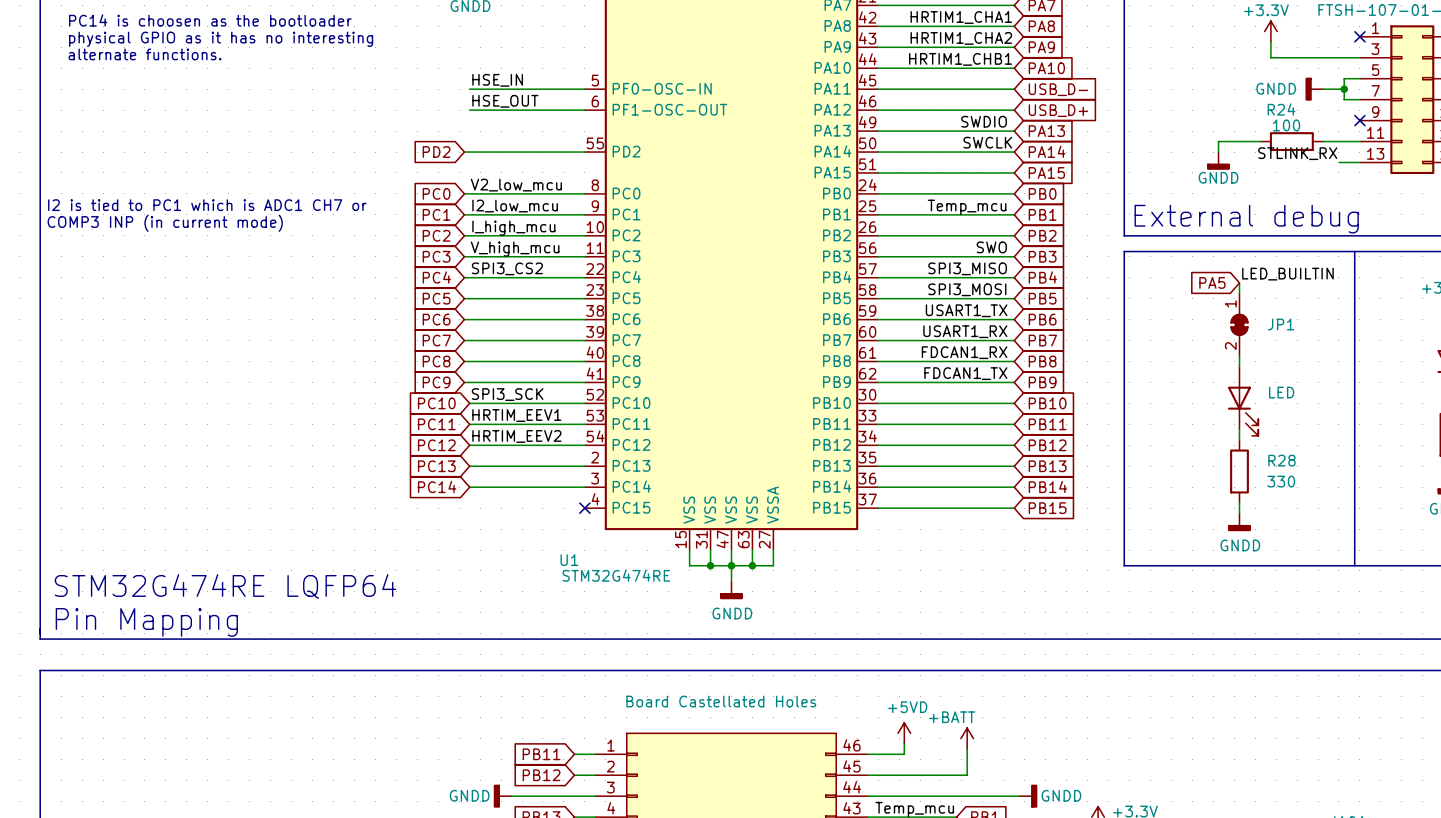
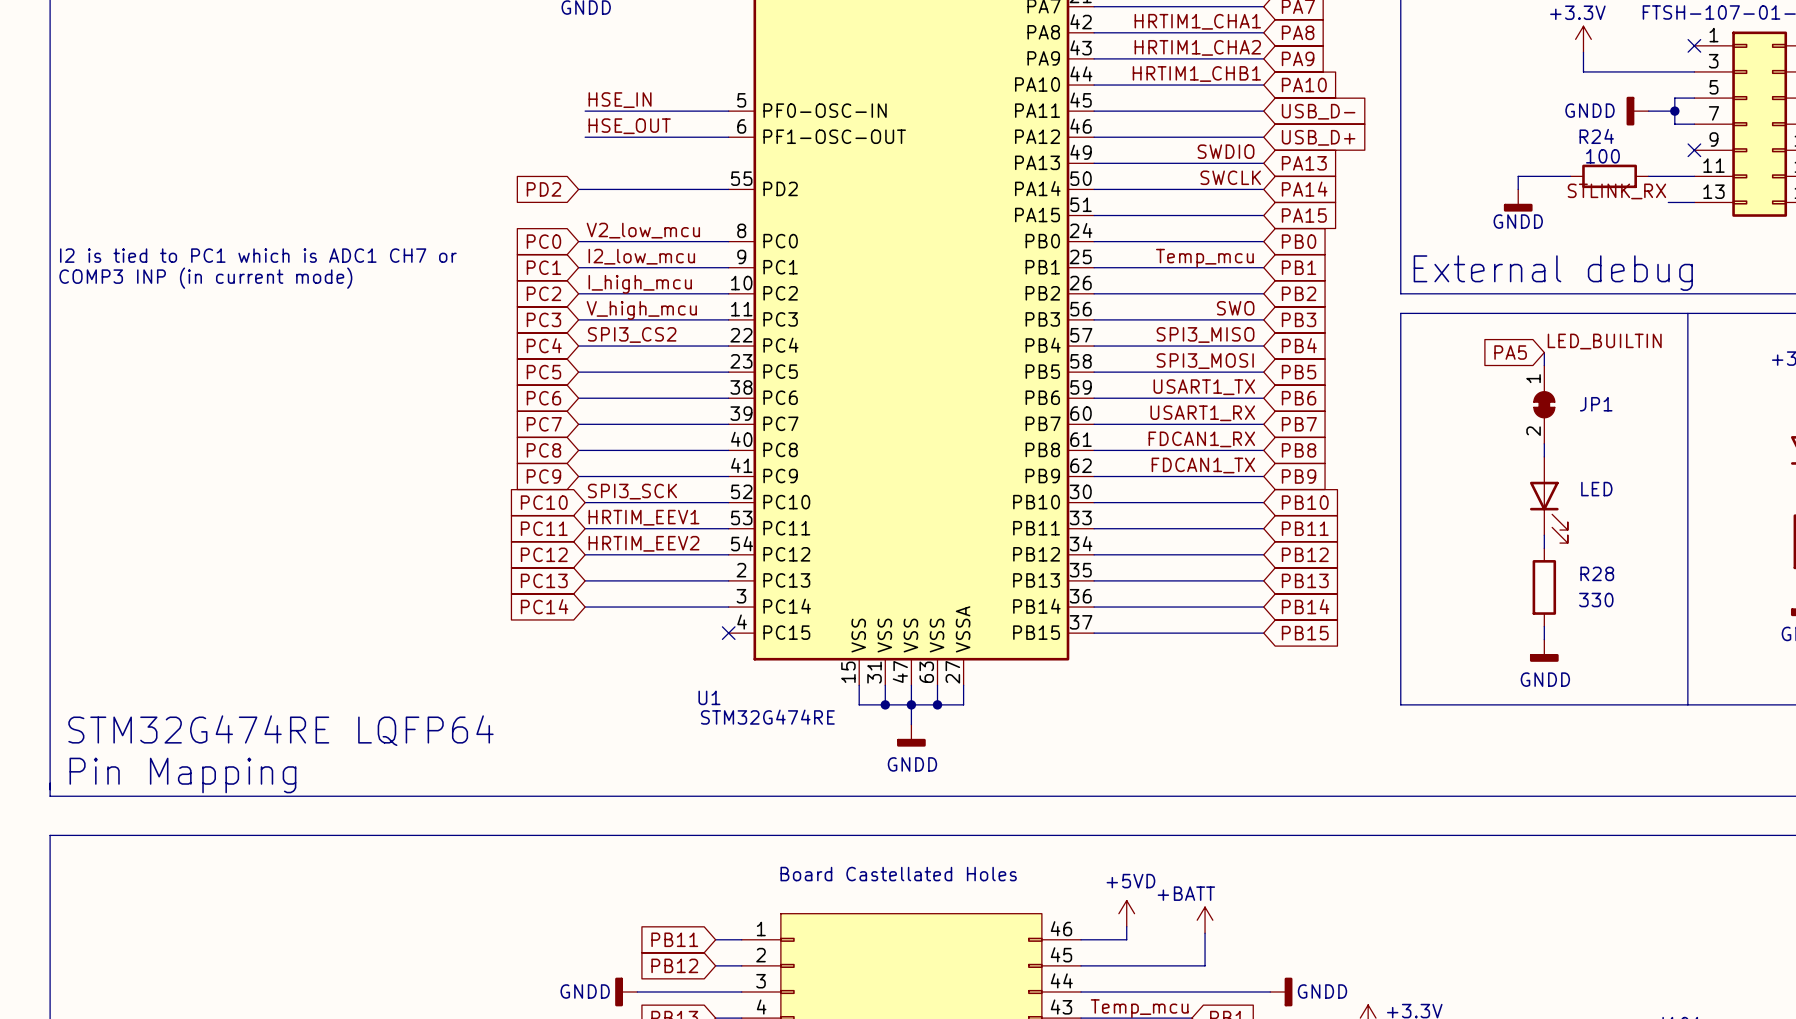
text: PC14 is choosen as the bootloader (210, 20) -> none
text: physical GPIO as it has no interesting (221, 39) -> none
text: alternate functions. (145, 54) -> none

